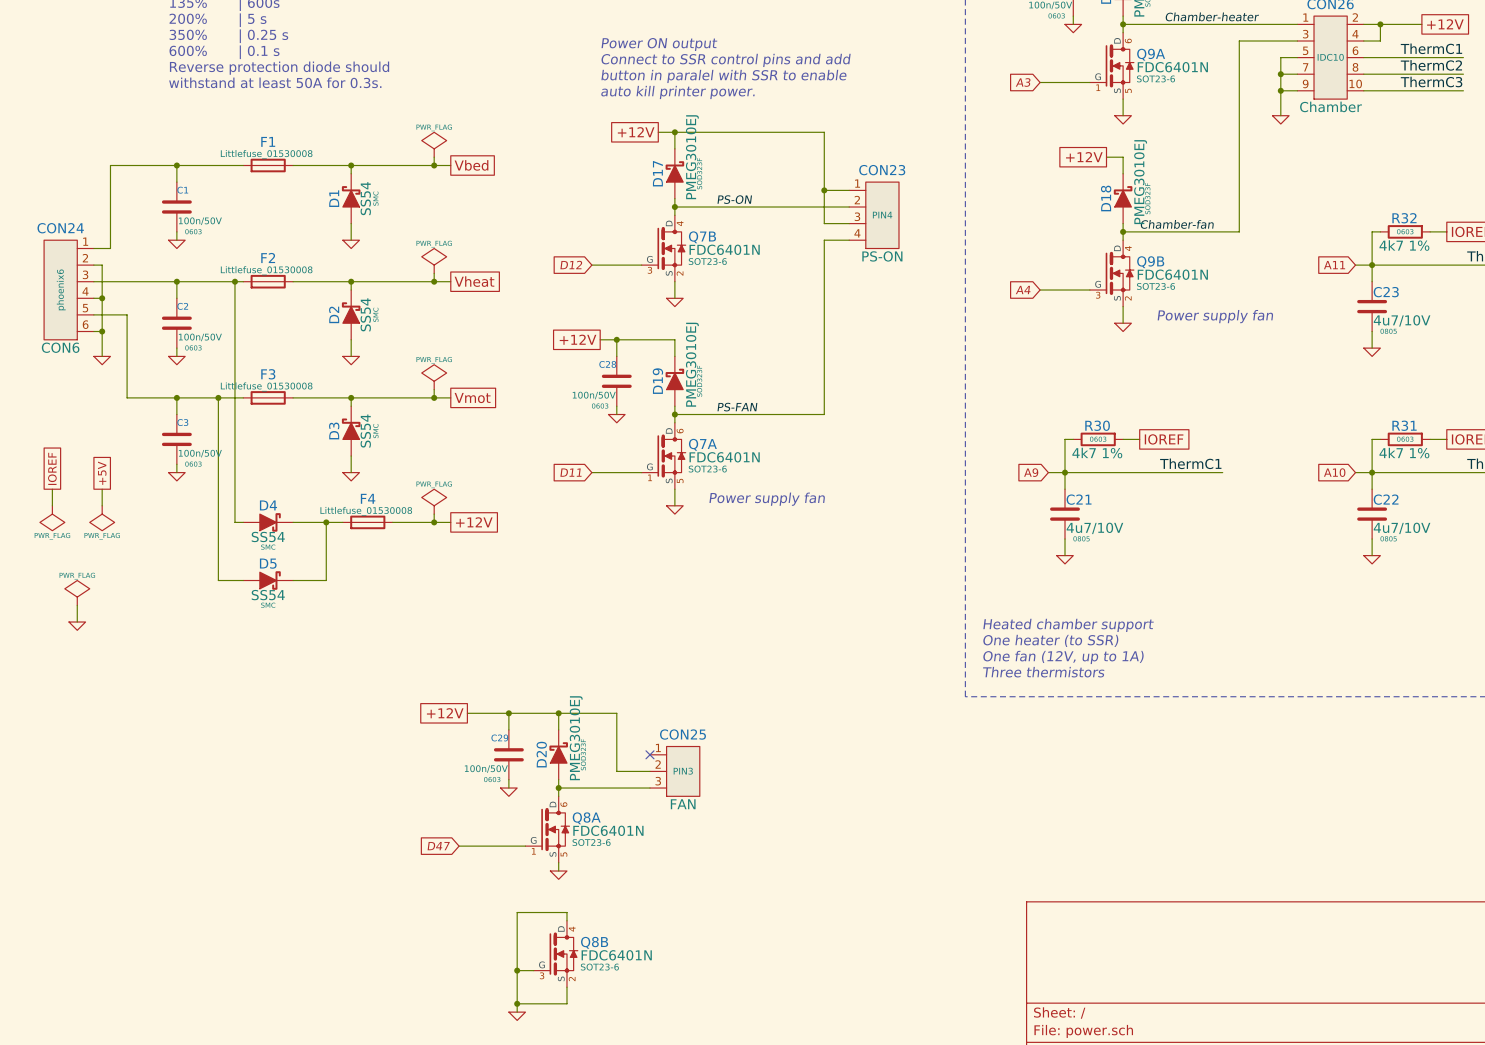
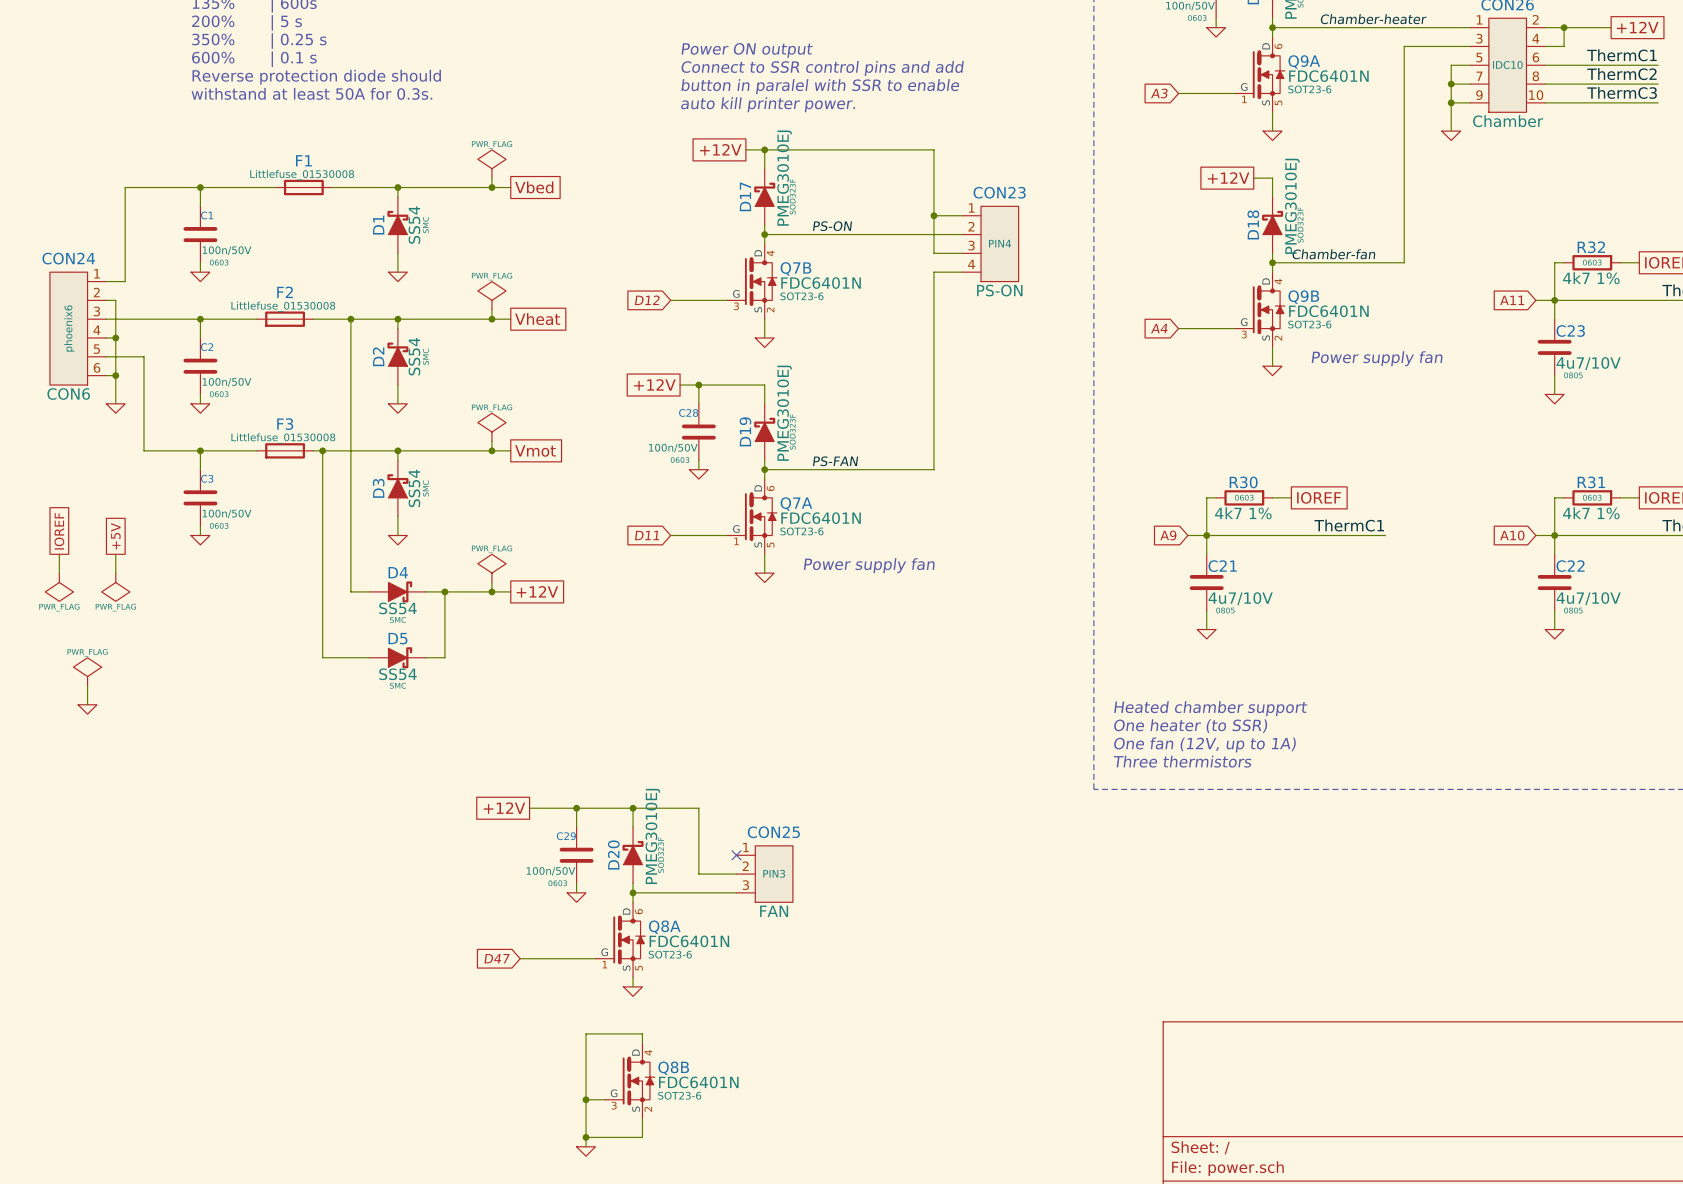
wire: (234, 281) (234, 522) (243, 522) -> none
junction: (234, 281) -> none
F2 position: (268, 281) -> (285, 319)
junction: none -> (350, 319)
wire: (218, 397) (218, 580) (243, 580) -> none
junction: (218, 397) -> none
F3 position: (268, 397) -> (285, 450)
wire: none -> (322, 450) (322, 657) (332, 657)
junction: none -> (322, 450)
D4 position: (268, 522) -> (397, 591)
wire: (293, 522) (309, 522) -> (350, 319) (350, 591)
junction: (326, 522) -> none
wire: (342, 522) (326, 522) (326, 580) -> none
F4: (367, 522) -> none
wire: none -> (426, 591) (444, 591) (444, 657) (426, 657)
junction: none -> (444, 591)
D5 position: (268, 580) -> (397, 657)

